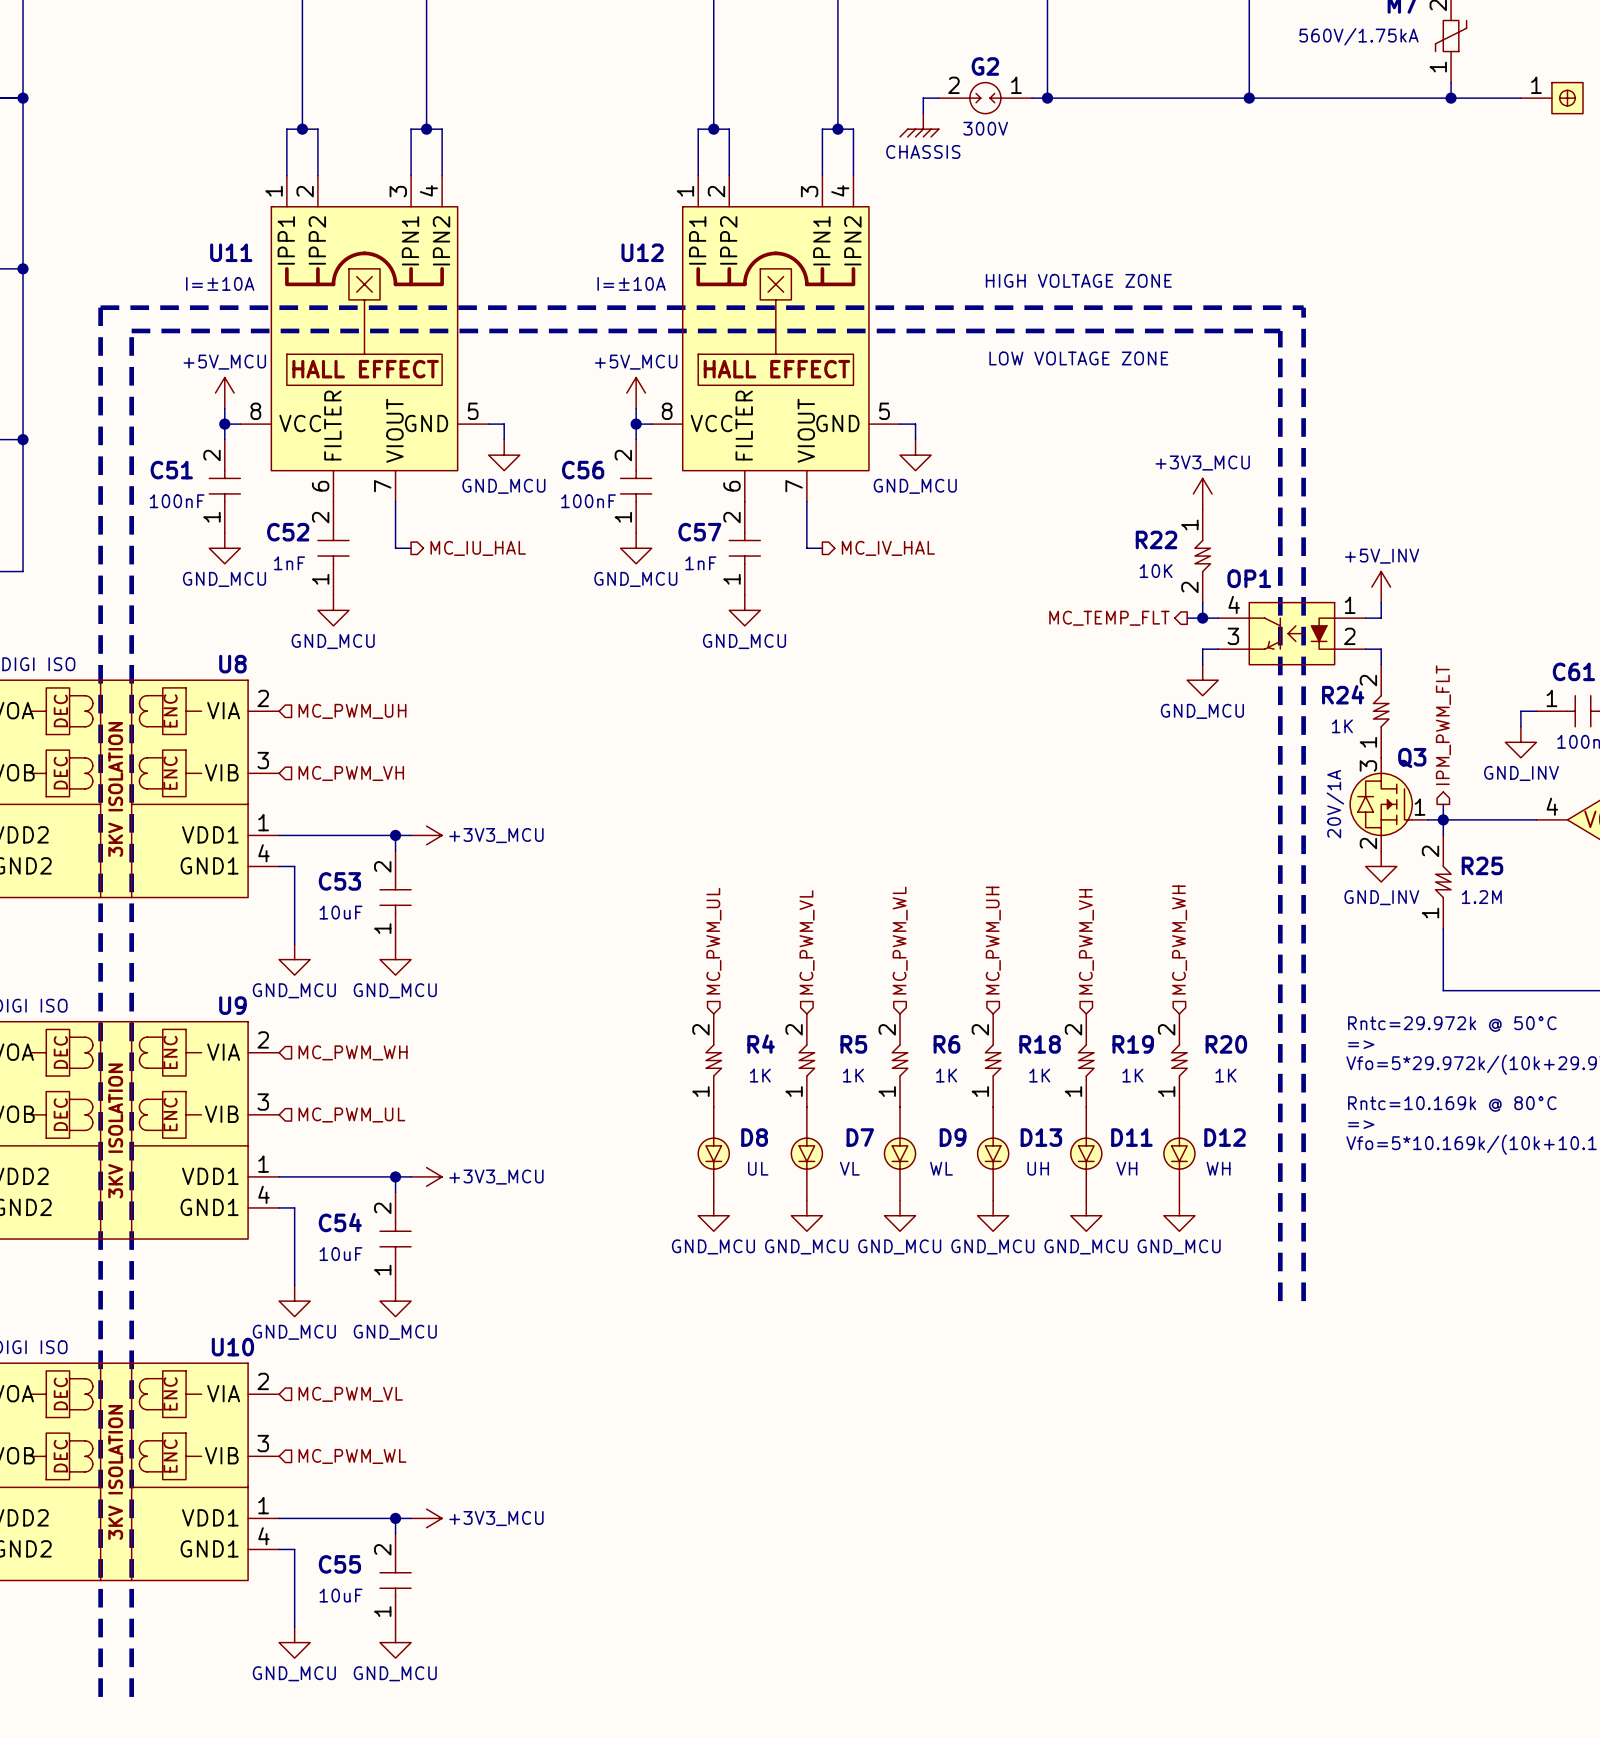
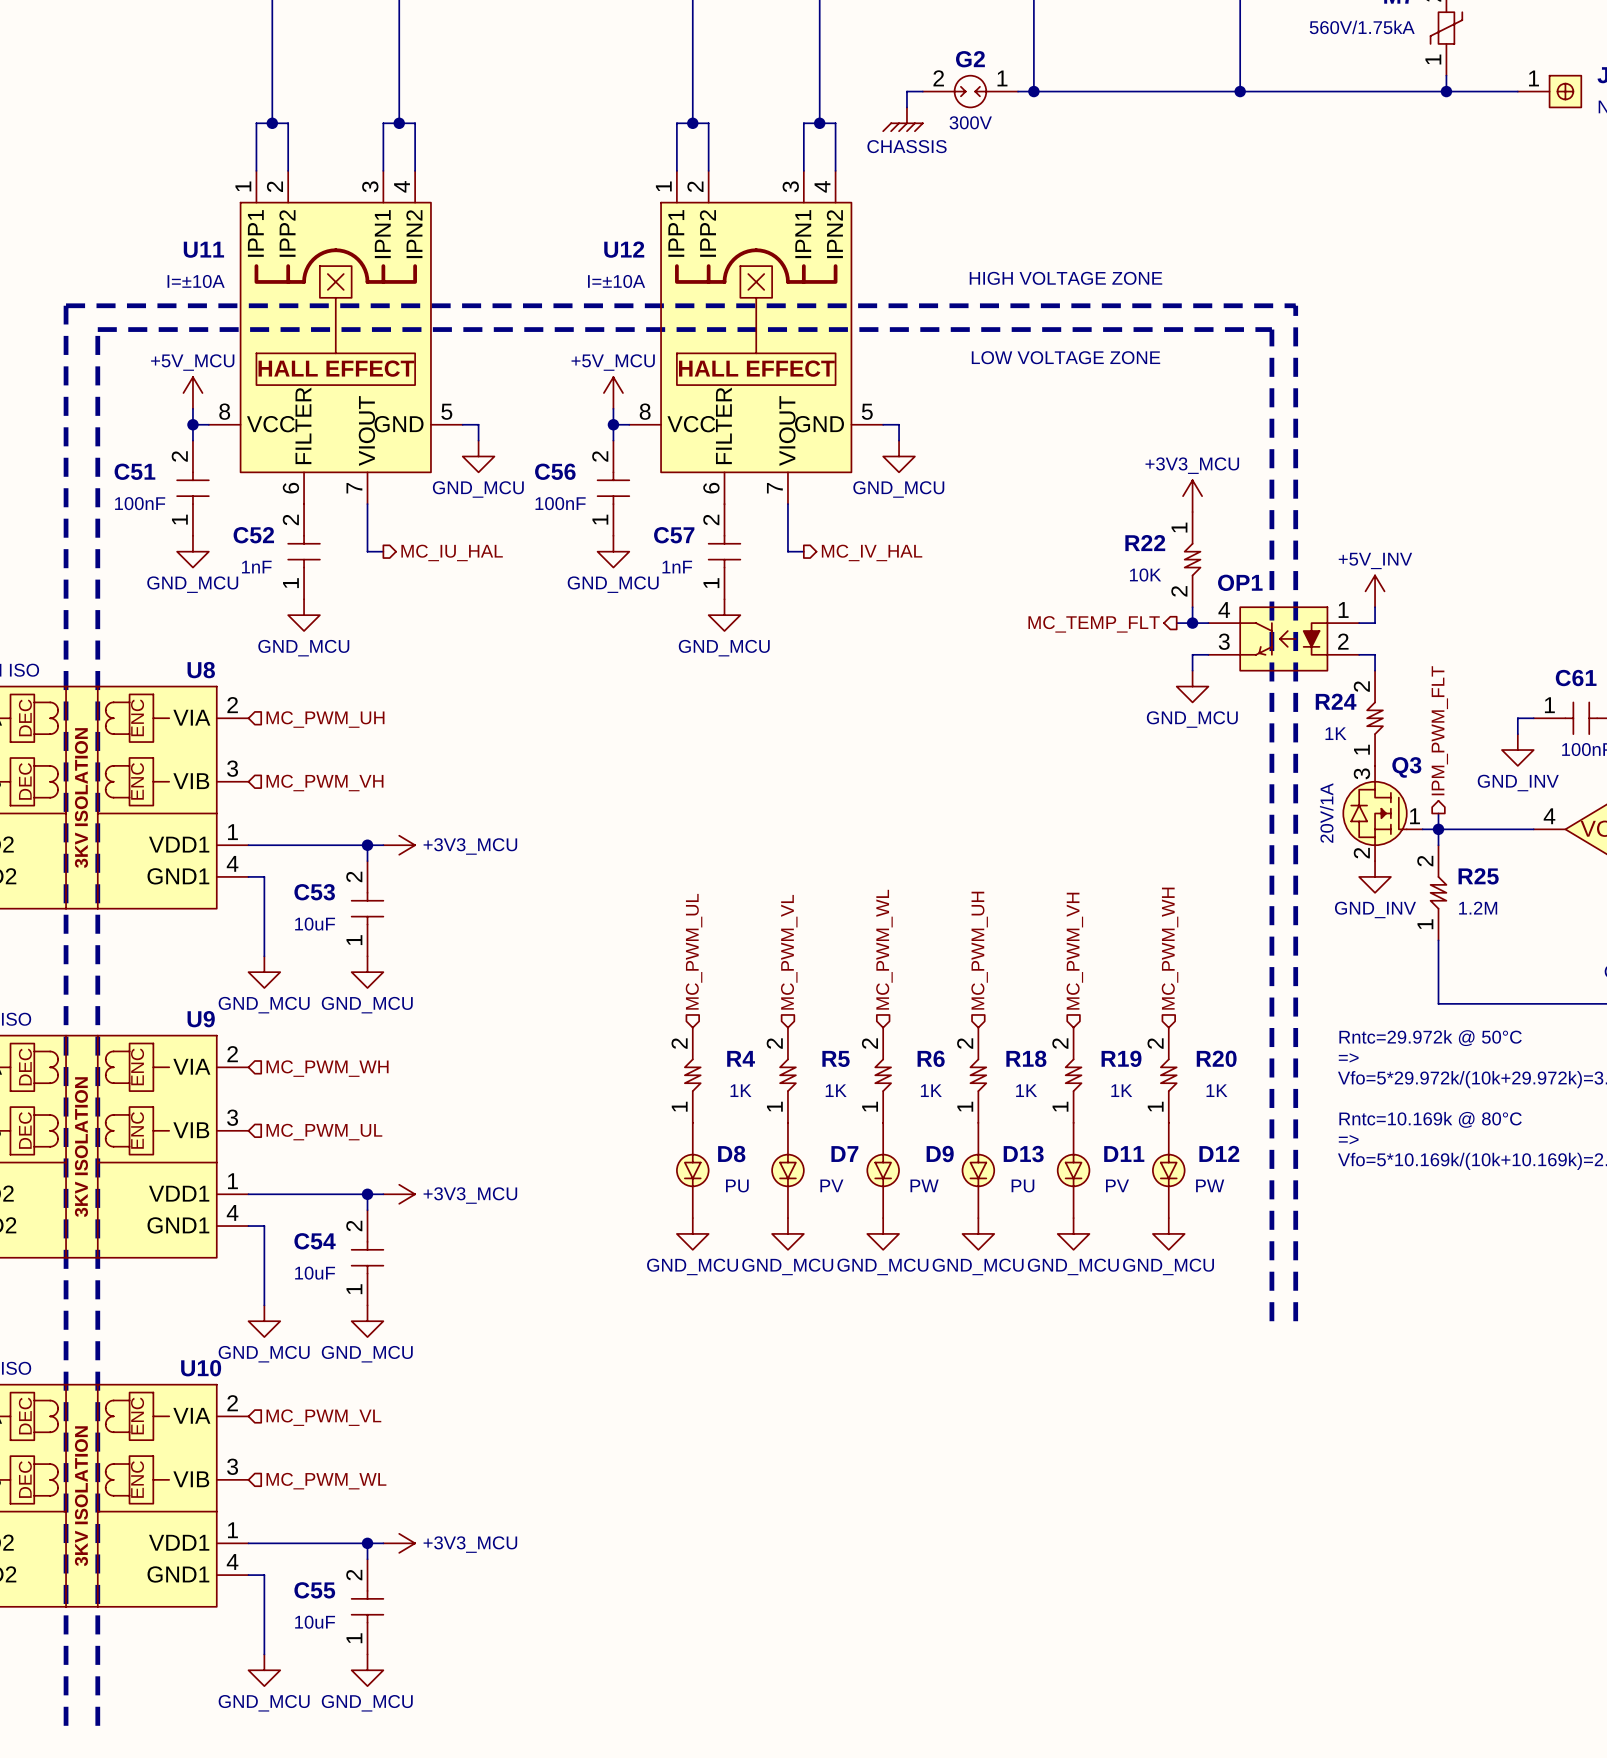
D8 value: UL (758, 1168) -> PU (737, 1185)
D7 value: VL (849, 1168) -> PV (831, 1185)
D9 value: WL (941, 1168) -> PW (924, 1185)
D13 value: UH (1038, 1168) -> PU (1022, 1185)
D11 value: VH (1126, 1168) -> PV (1117, 1185)
D12 value: WH (1218, 1168) -> PW (1210, 1185)

